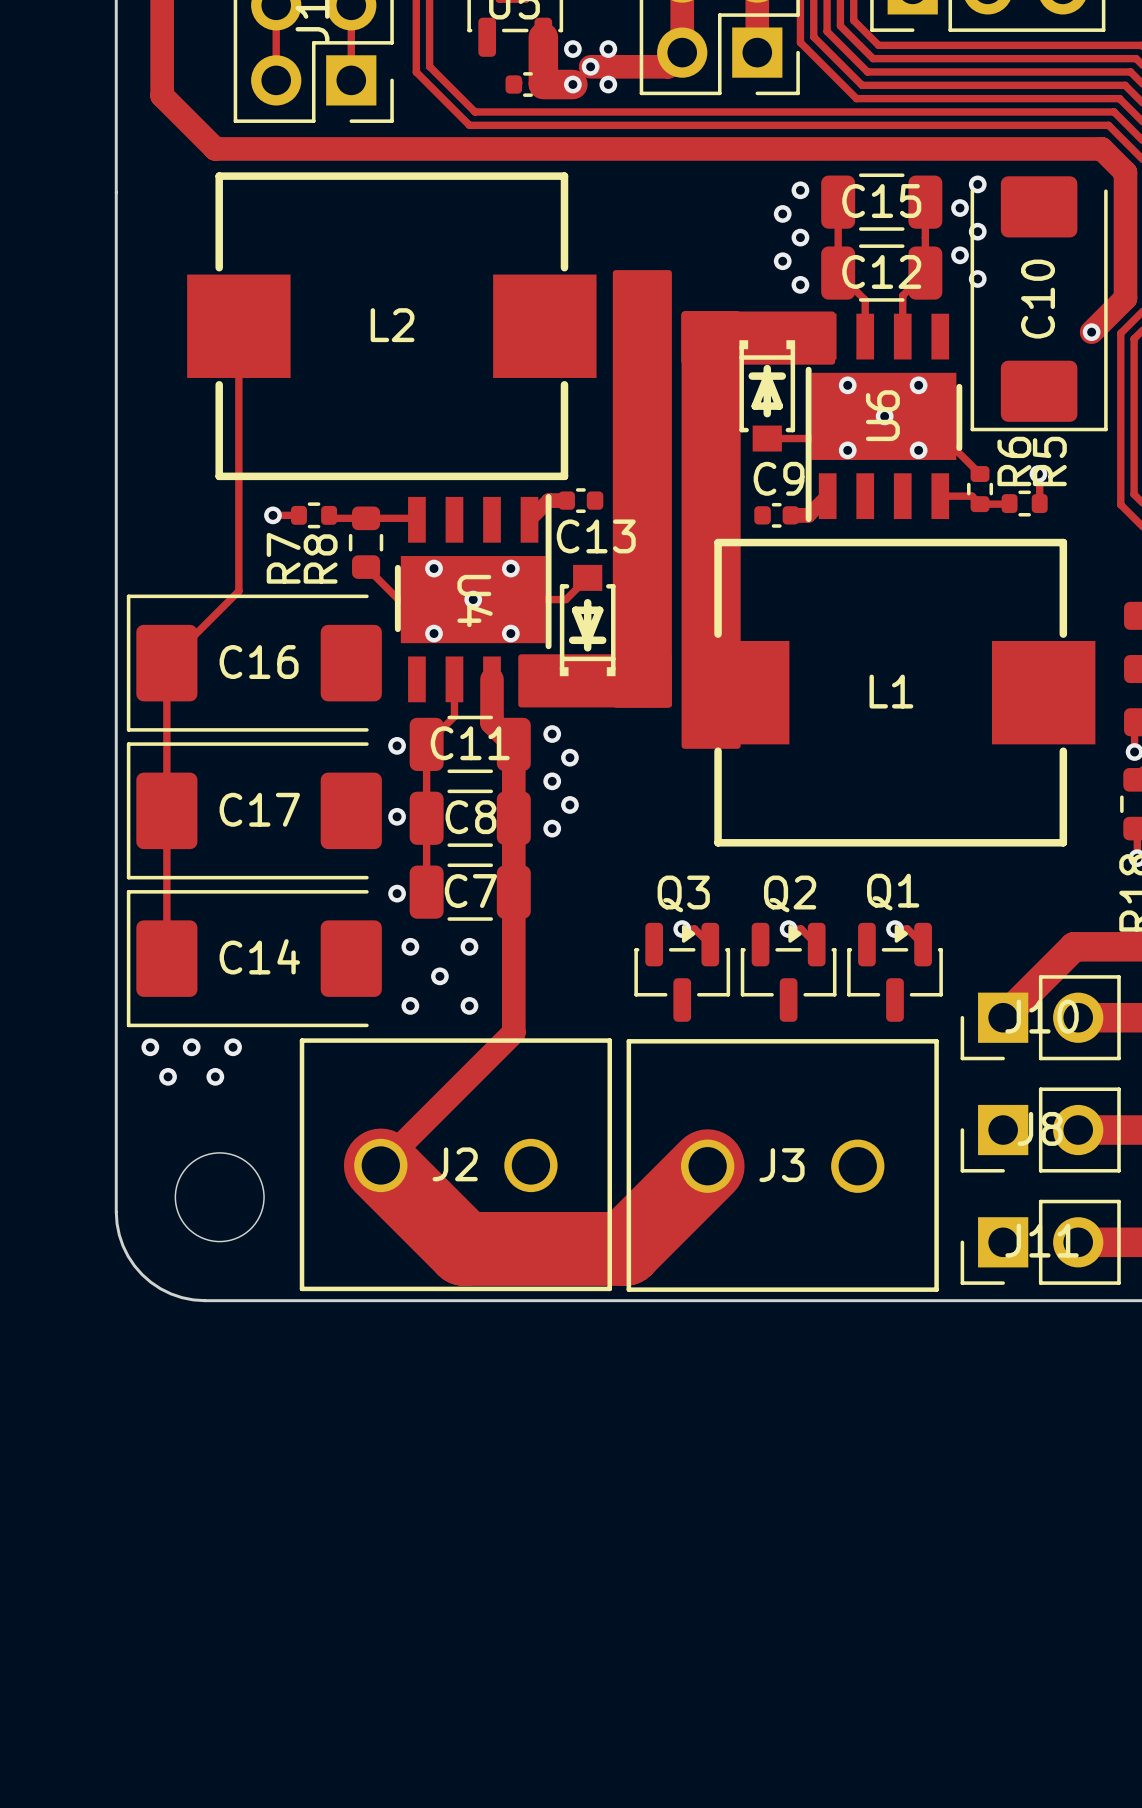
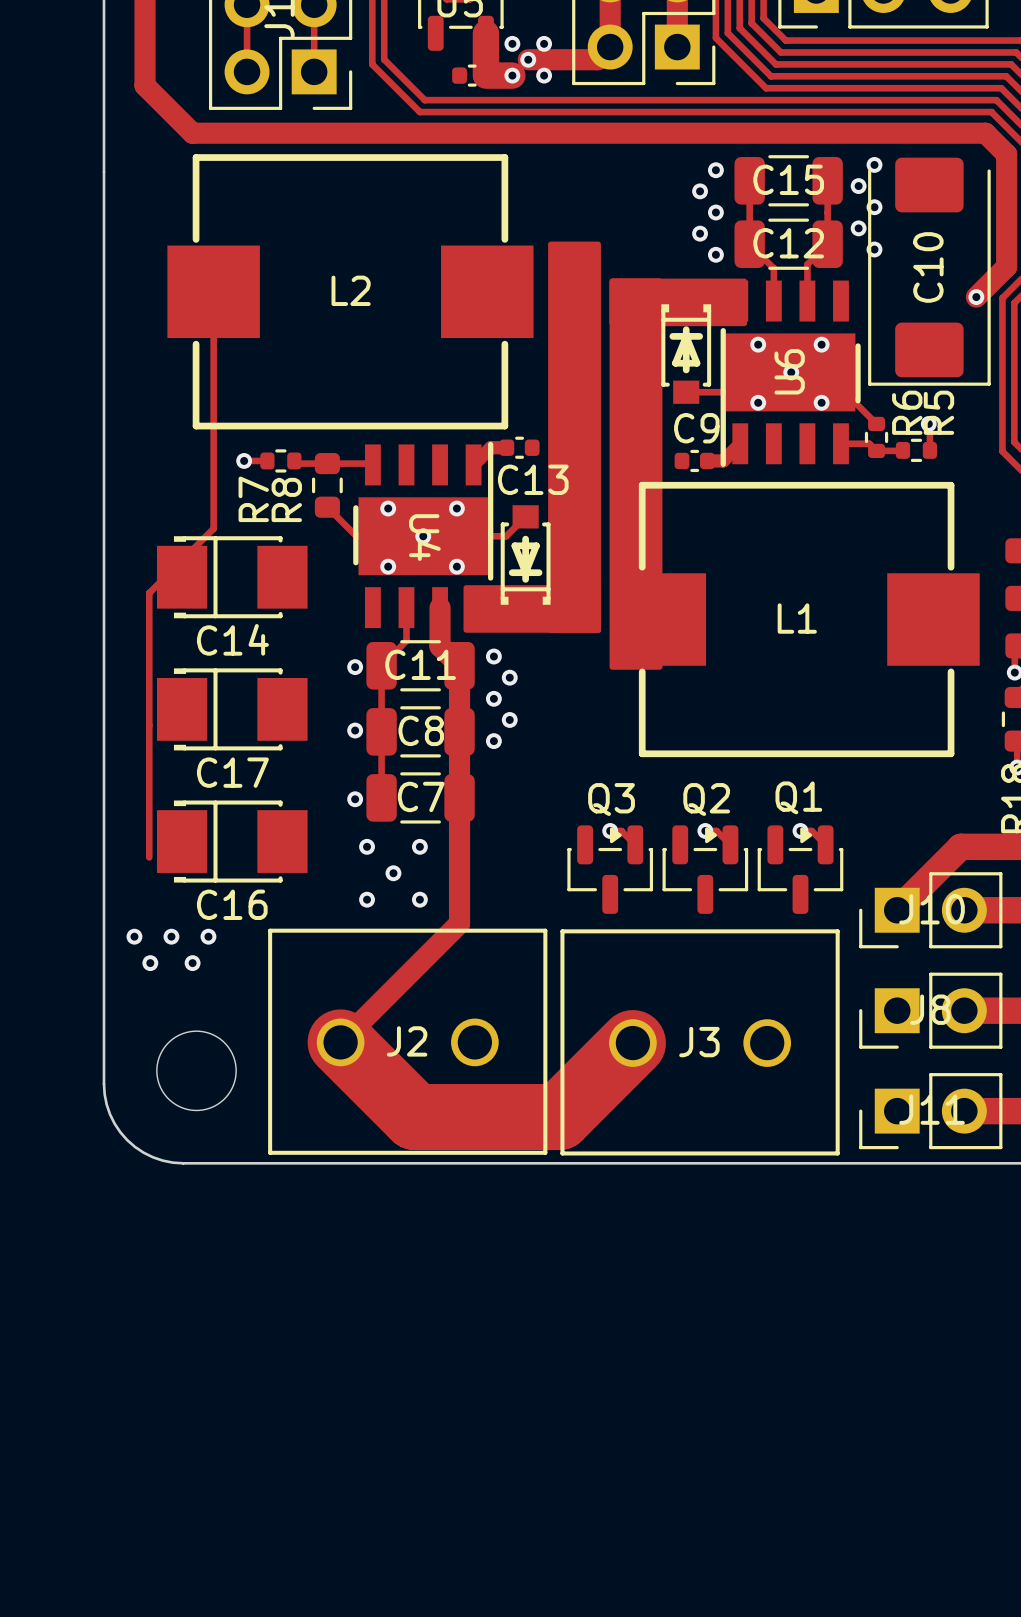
C16 footprint: [126, 594, 382, 732] -> [157, 800, 308, 883]
C16 name position: C16 (259, 662) -> C16 (232, 904)
C17 footprint: [126, 742, 382, 880] -> [157, 668, 308, 751]
C17 name position: C17 (259, 809) -> C17 (232, 772)
C14 footprint: [126, 890, 382, 1028] -> [157, 536, 308, 619]
C14 name position: C14 (259, 956) -> C14 (232, 639)

